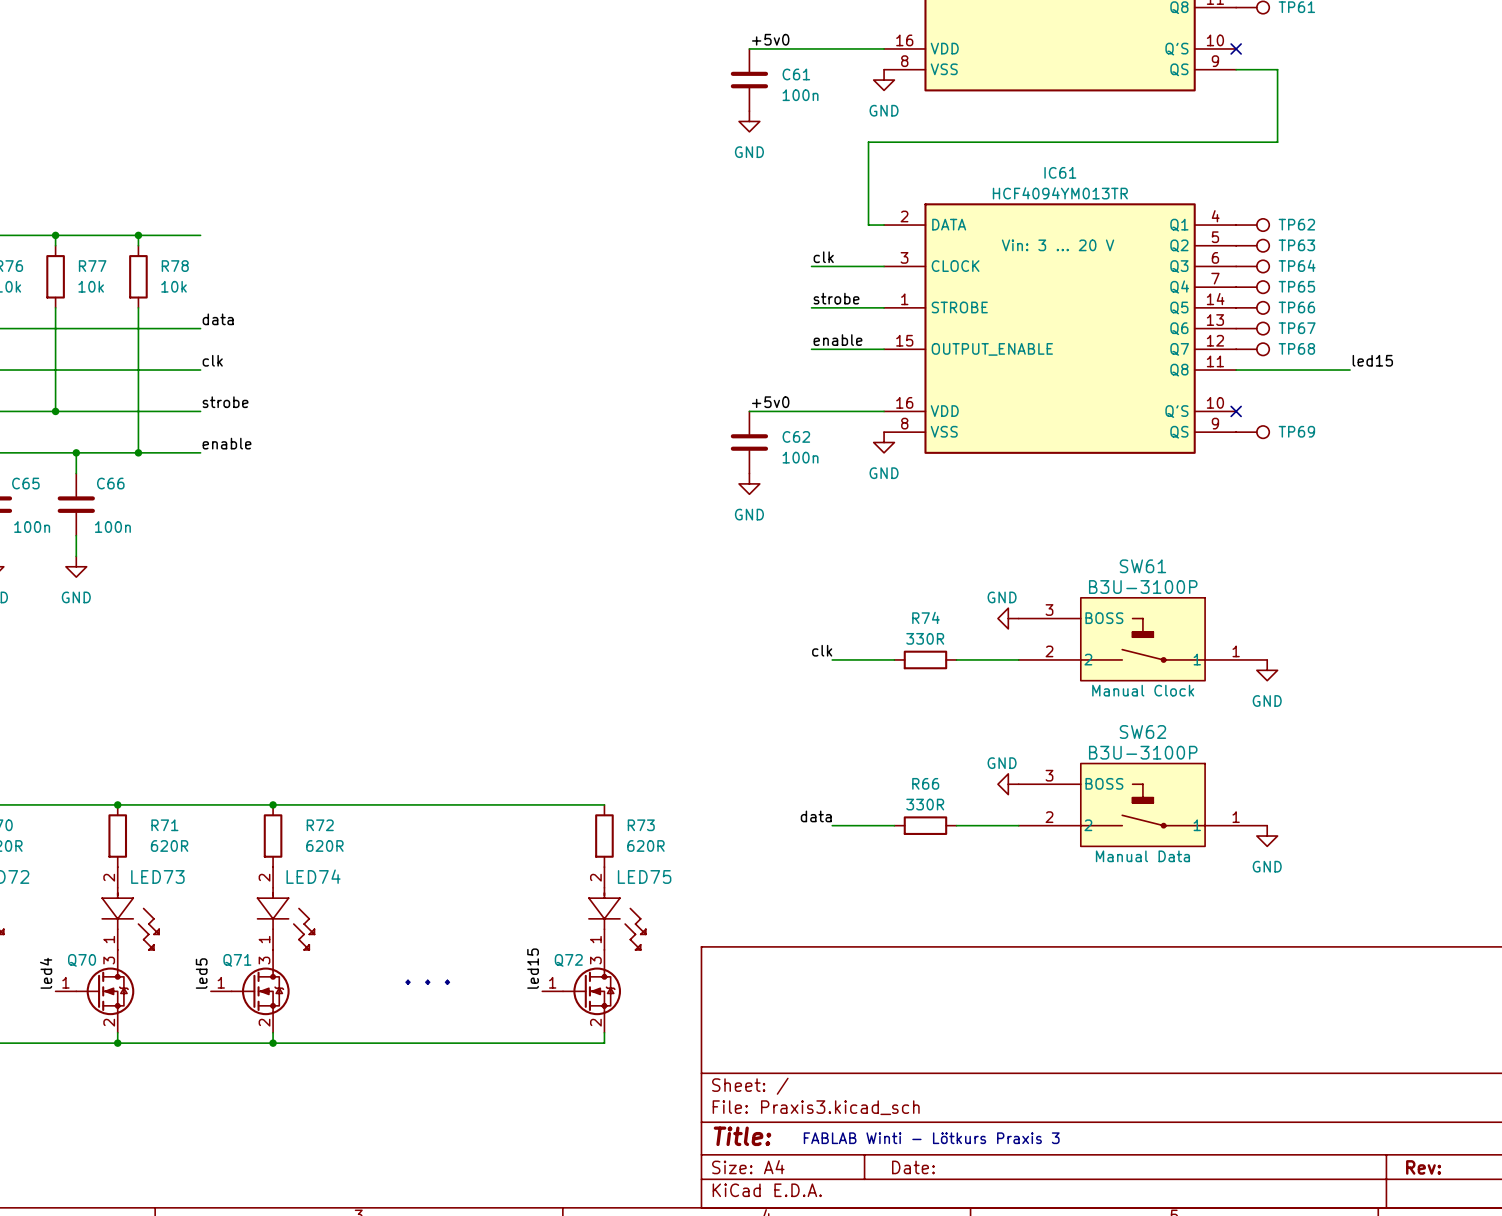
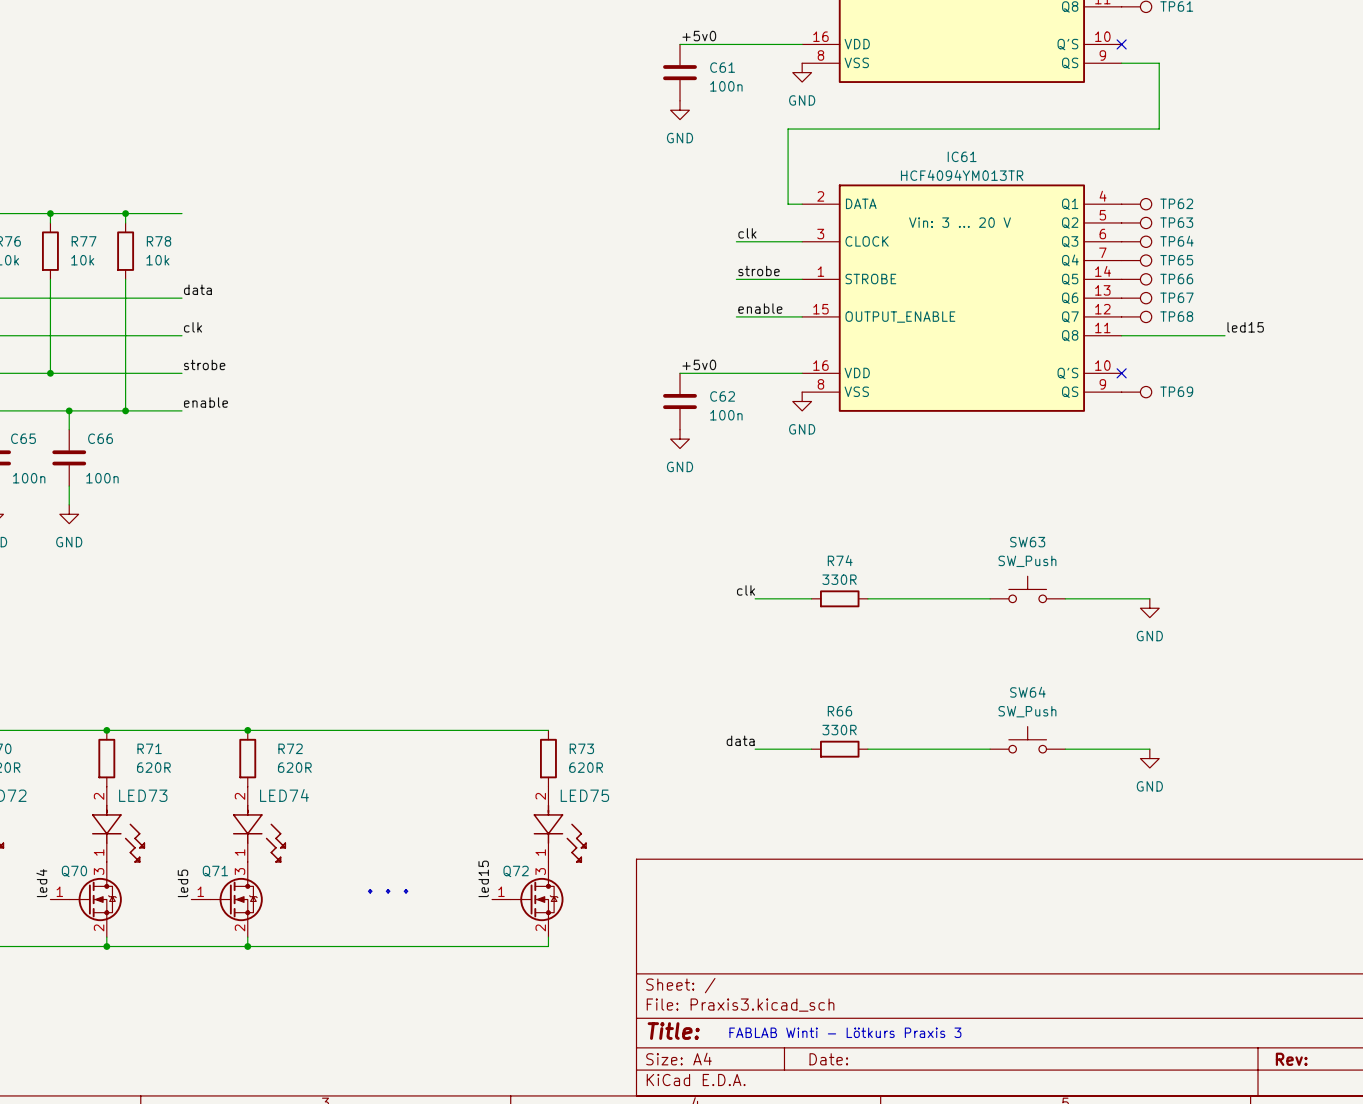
power symbol: GND (1008, 618) -> none
SW61: B3U-3100P (1142, 639) -> none
SW63: none -> SW_Push (1027, 589)
power symbol: GND (1008, 784) -> none
SW62: B3U-3100P (1142, 804) -> none
SW64: none -> SW_Push (1027, 739)

